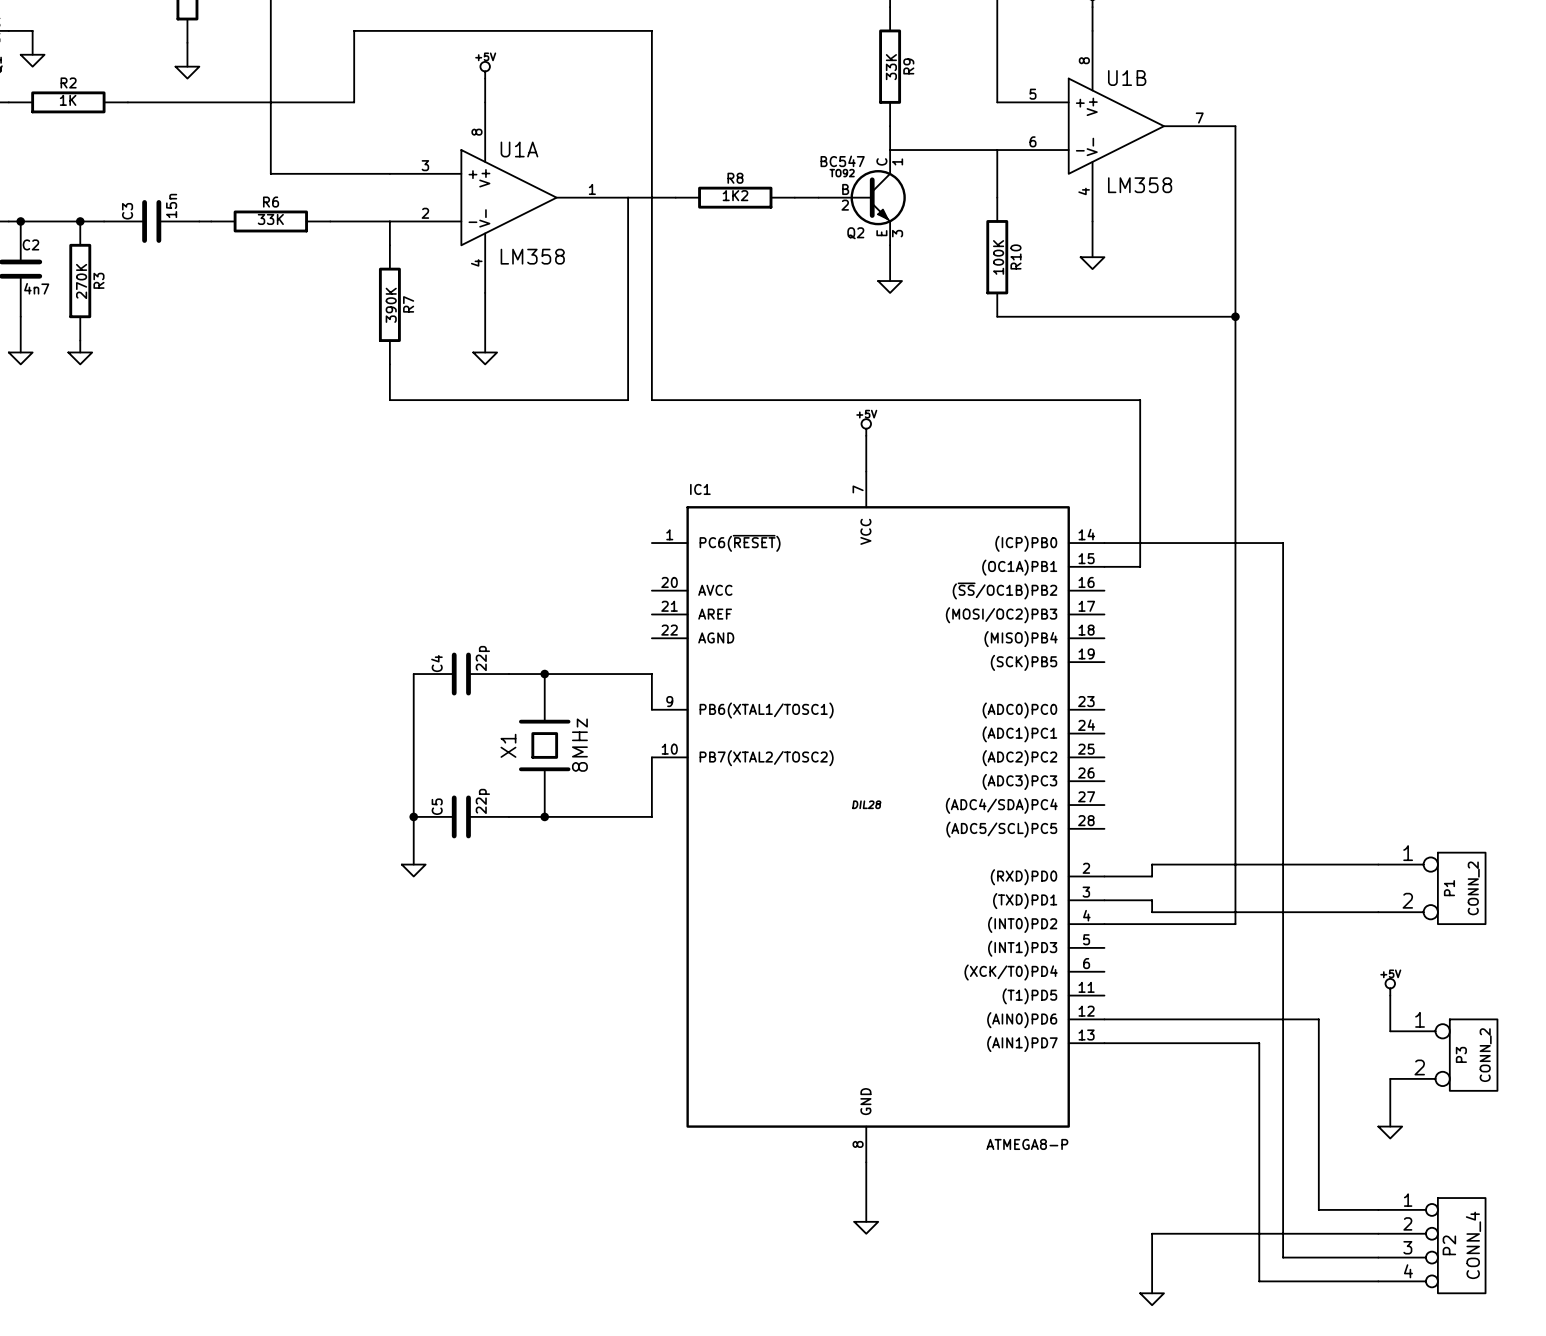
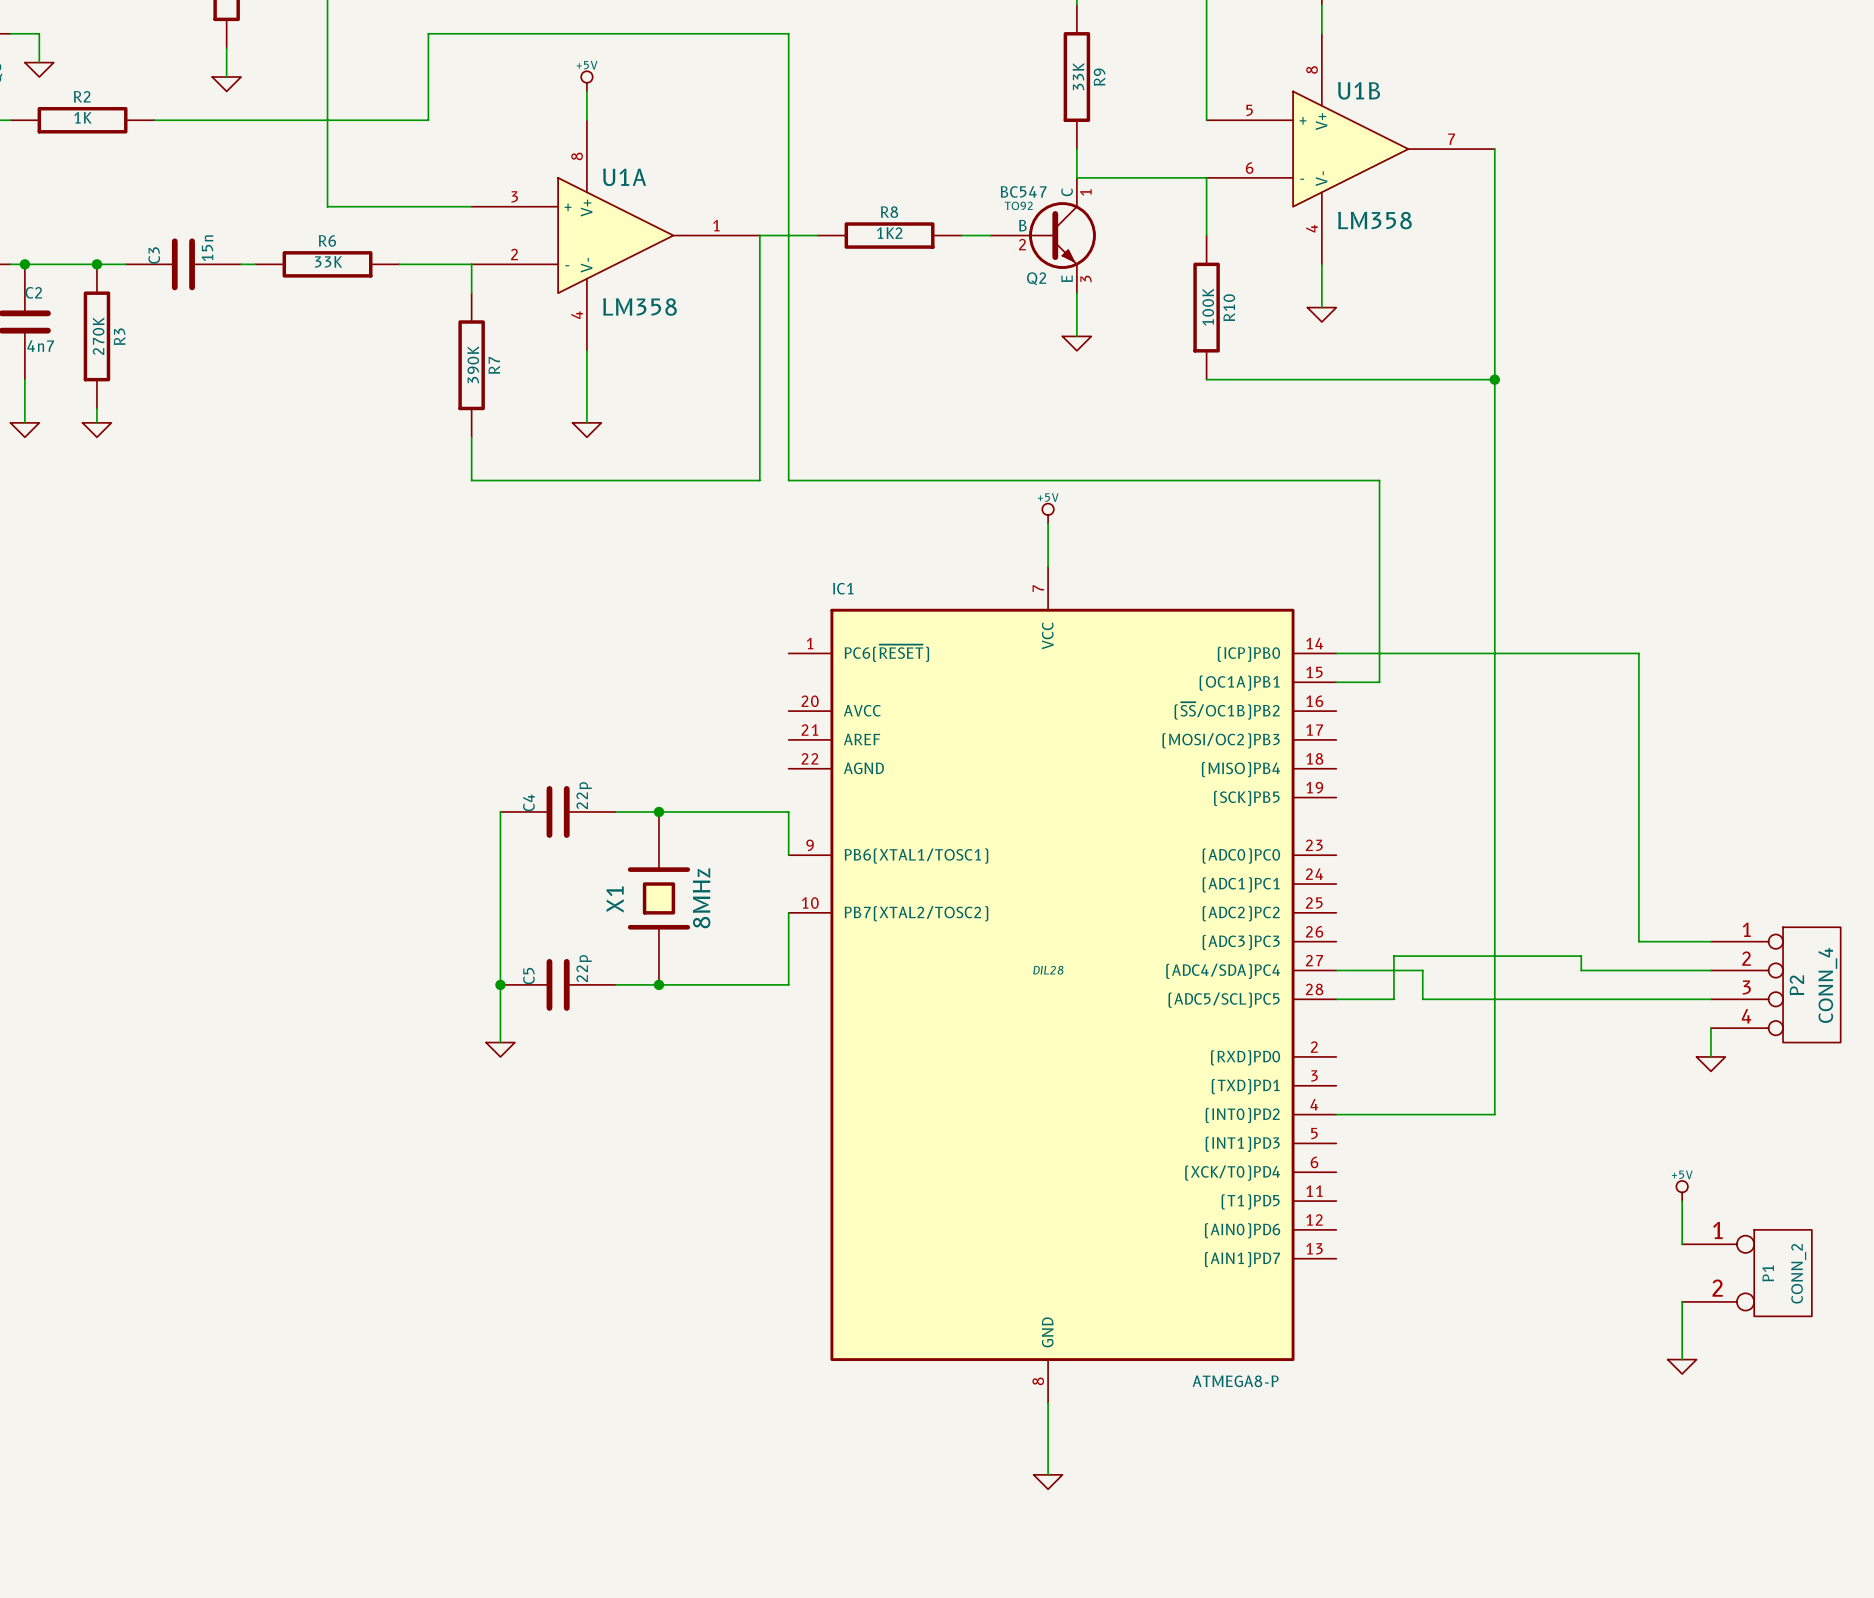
wire: (1283, 543) (1283, 1257) (1378, 1257) -> (1552, 653) (1638, 653) (1638, 941) (1710, 941)
wire: none -> (1336, 970) (1422, 970) (1422, 999) (1710, 999)
wire: none -> (1710, 970) (1581, 970) (1581, 956) (1393, 956) (1393, 999) (1336, 999)
wire: none -> (1710, 1028) (1710, 1056)
wire: (1378, 864) (1152, 864) (1152, 876) (1104, 876) -> none
power symbol: none -> (1710, 1064)
P1: CONN_2 (1431, 888) -> none
wire: (1104, 900) (1152, 900) (1152, 912) (1378, 912) -> none
wire: (1104, 1019) (1318, 1019) (1318, 1209) (1378, 1209) -> none
wire: (1104, 1043) (1259, 1043) (1259, 1281) (1378, 1281) -> none
P3 name: P3 (1461, 1054) -> P1 (1768, 1273)
wire: (1378, 1233) (1152, 1233) (1152, 1293) -> none
P2 position: (1431, 1245) -> (1775, 984)
power symbol: (1152, 1299) -> none

